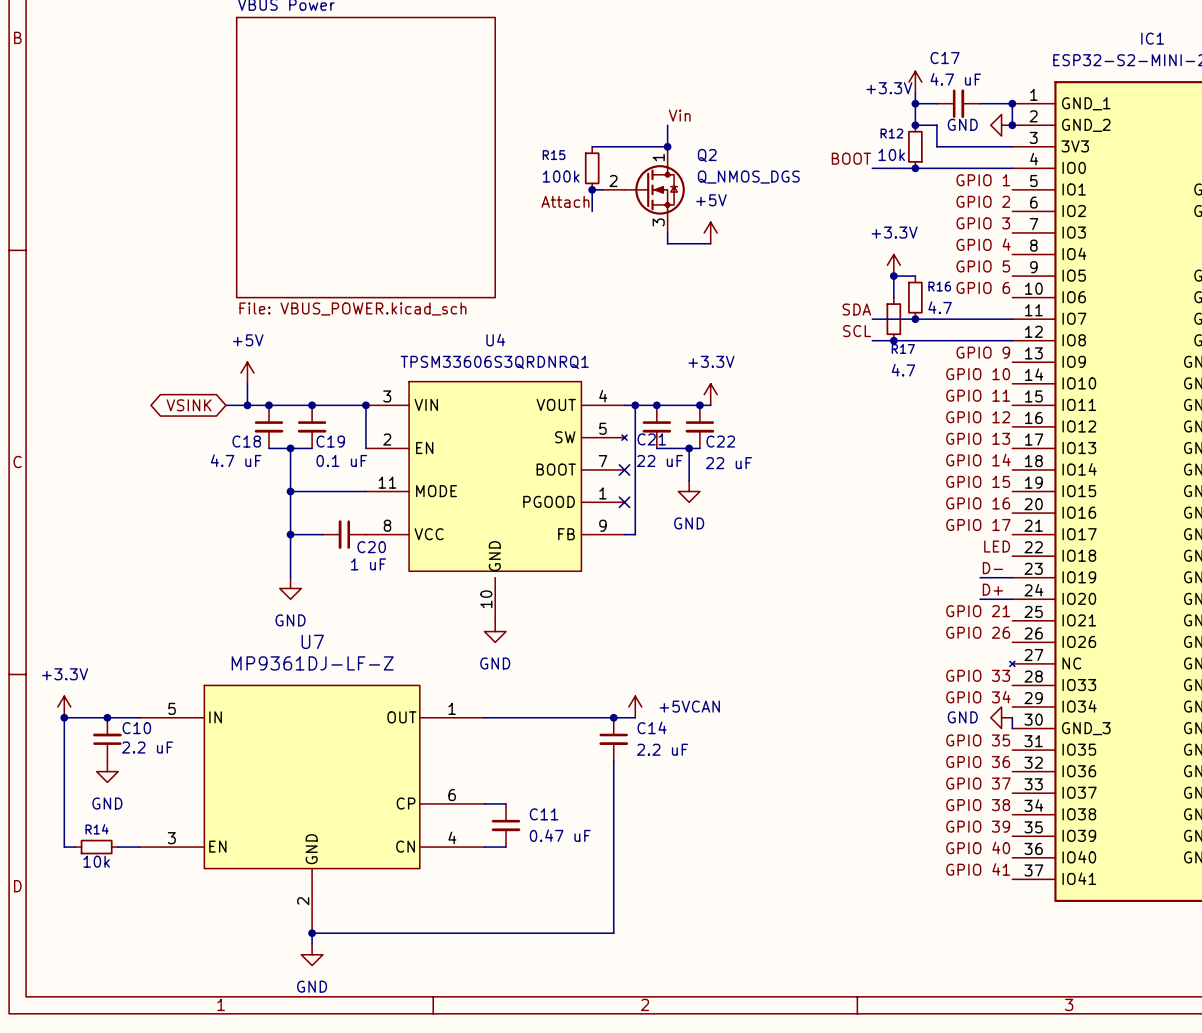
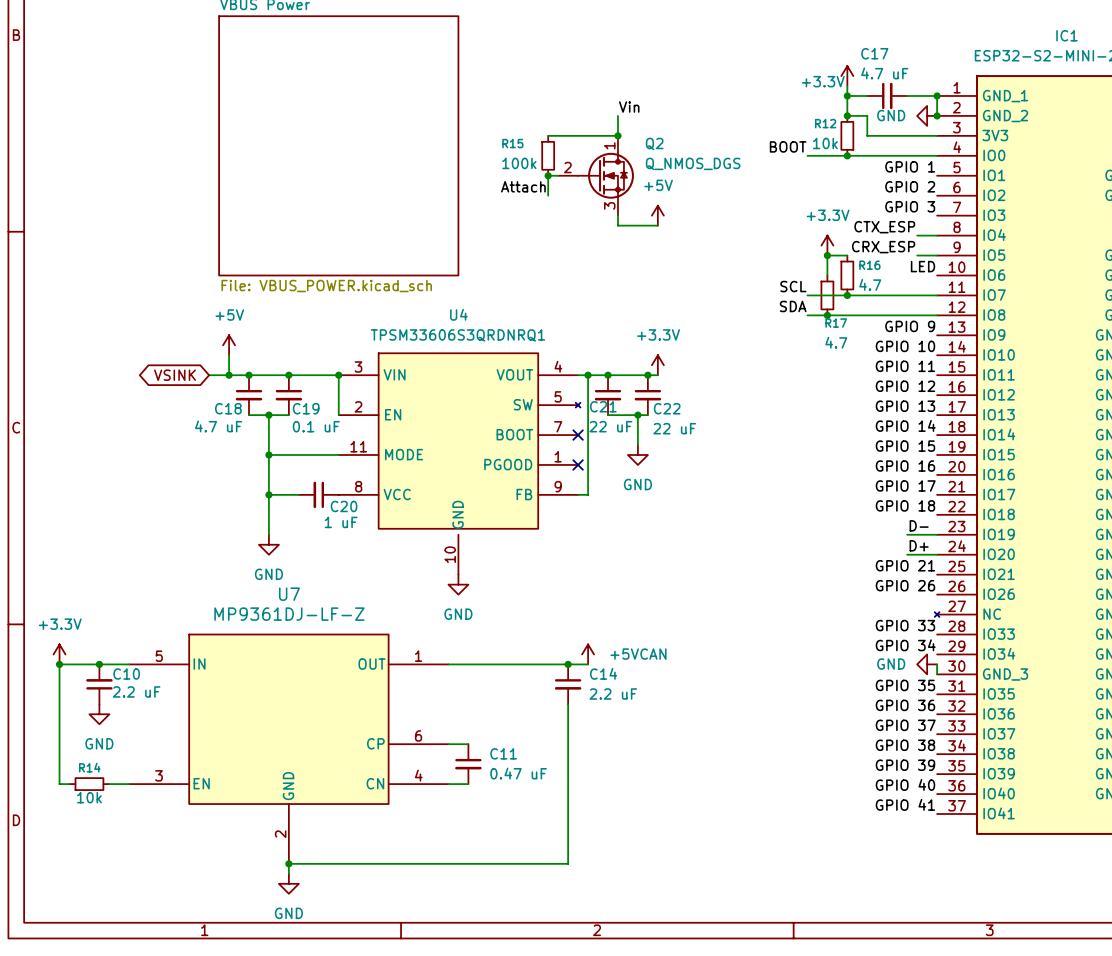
label: GPIO 4 (983, 244) -> none
label: none -> CTX_ESP (884, 227)
wire: none -> (917, 235) (937, 235)
label: none -> CRX_ESP (883, 247)
label: GPIO 5 (983, 266) -> none
wire: none -> (917, 255) (937, 255)
label: GPIO 6 (983, 287) -> LED (923, 266)
label: SDA (856, 309) -> SCL (793, 286)
label: SCL (857, 331) -> SDA (793, 306)
label: LED (997, 546) -> GPIO 18 (905, 505)

